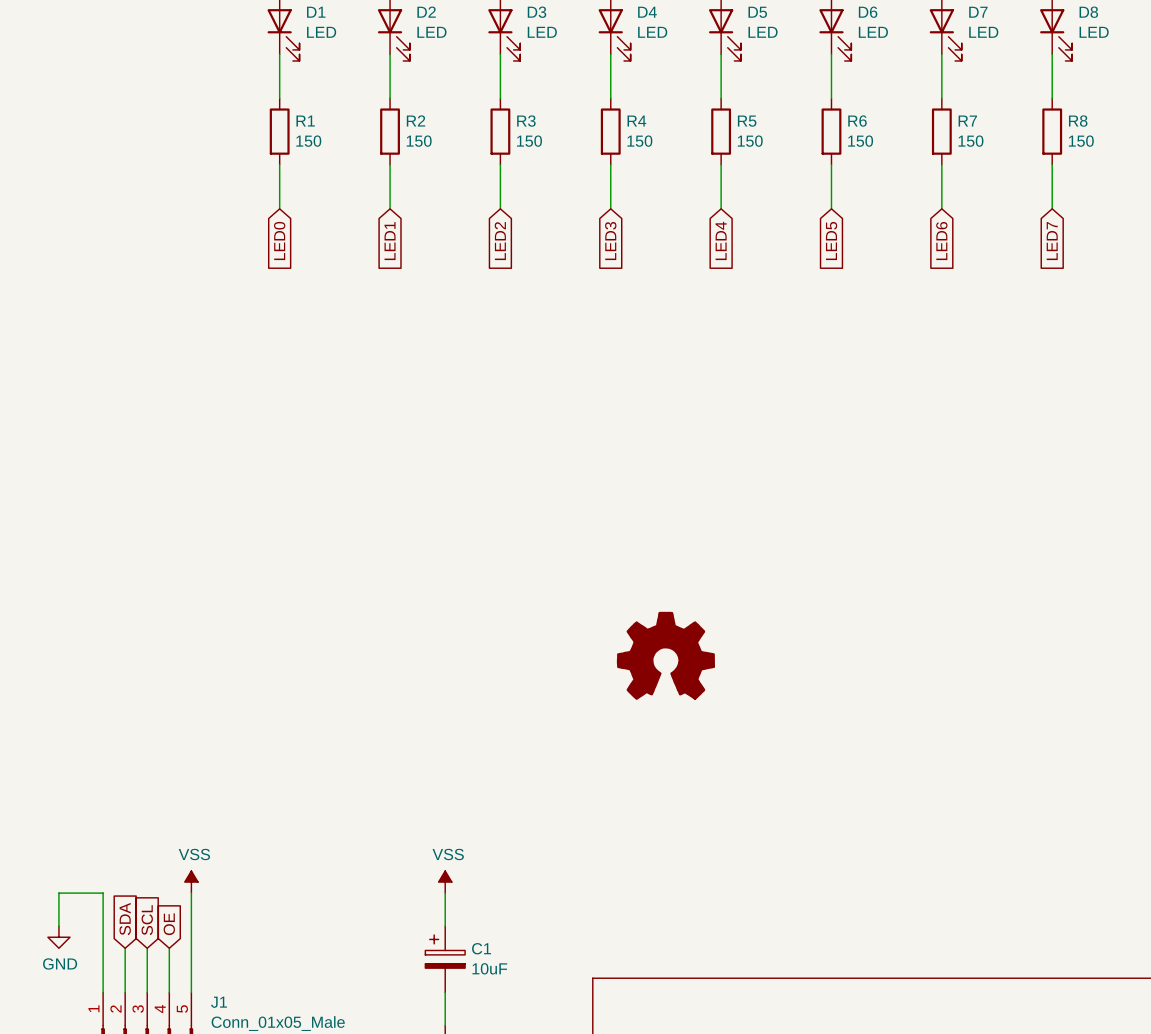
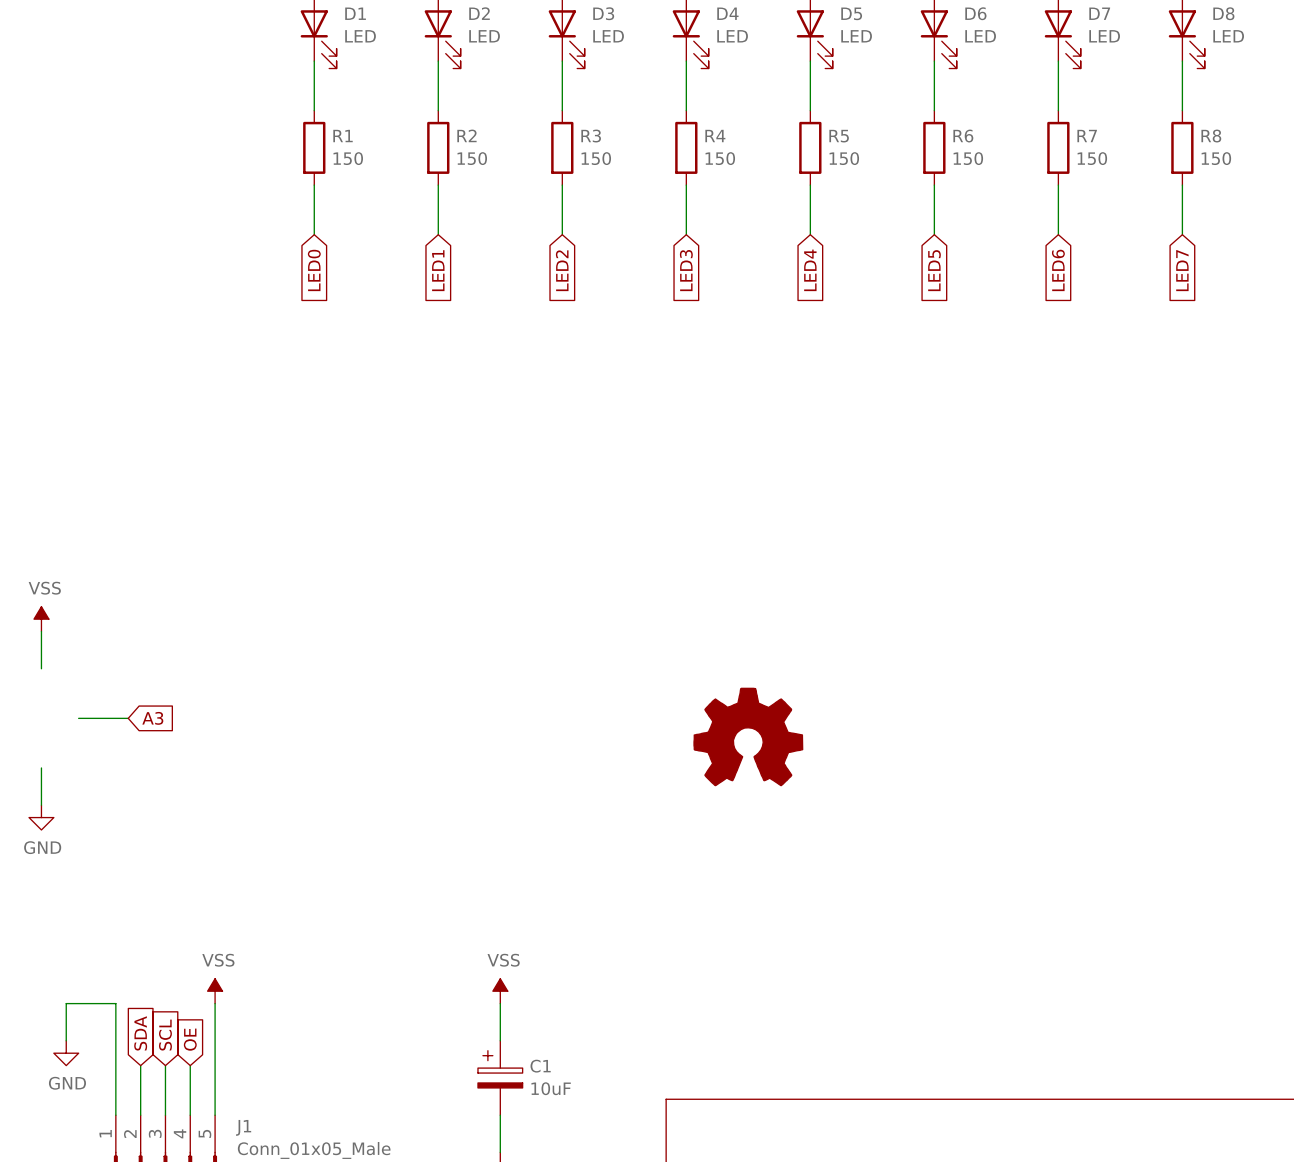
power symbol: none -> VSS (41, 619)
wire: none -> (41, 631) (41, 668)
wire: none -> (78, 718) (128, 718)
global label: none -> A3 (152, 718)
wire: none -> (41, 767) (41, 805)
power symbol: none -> GND (41, 817)

